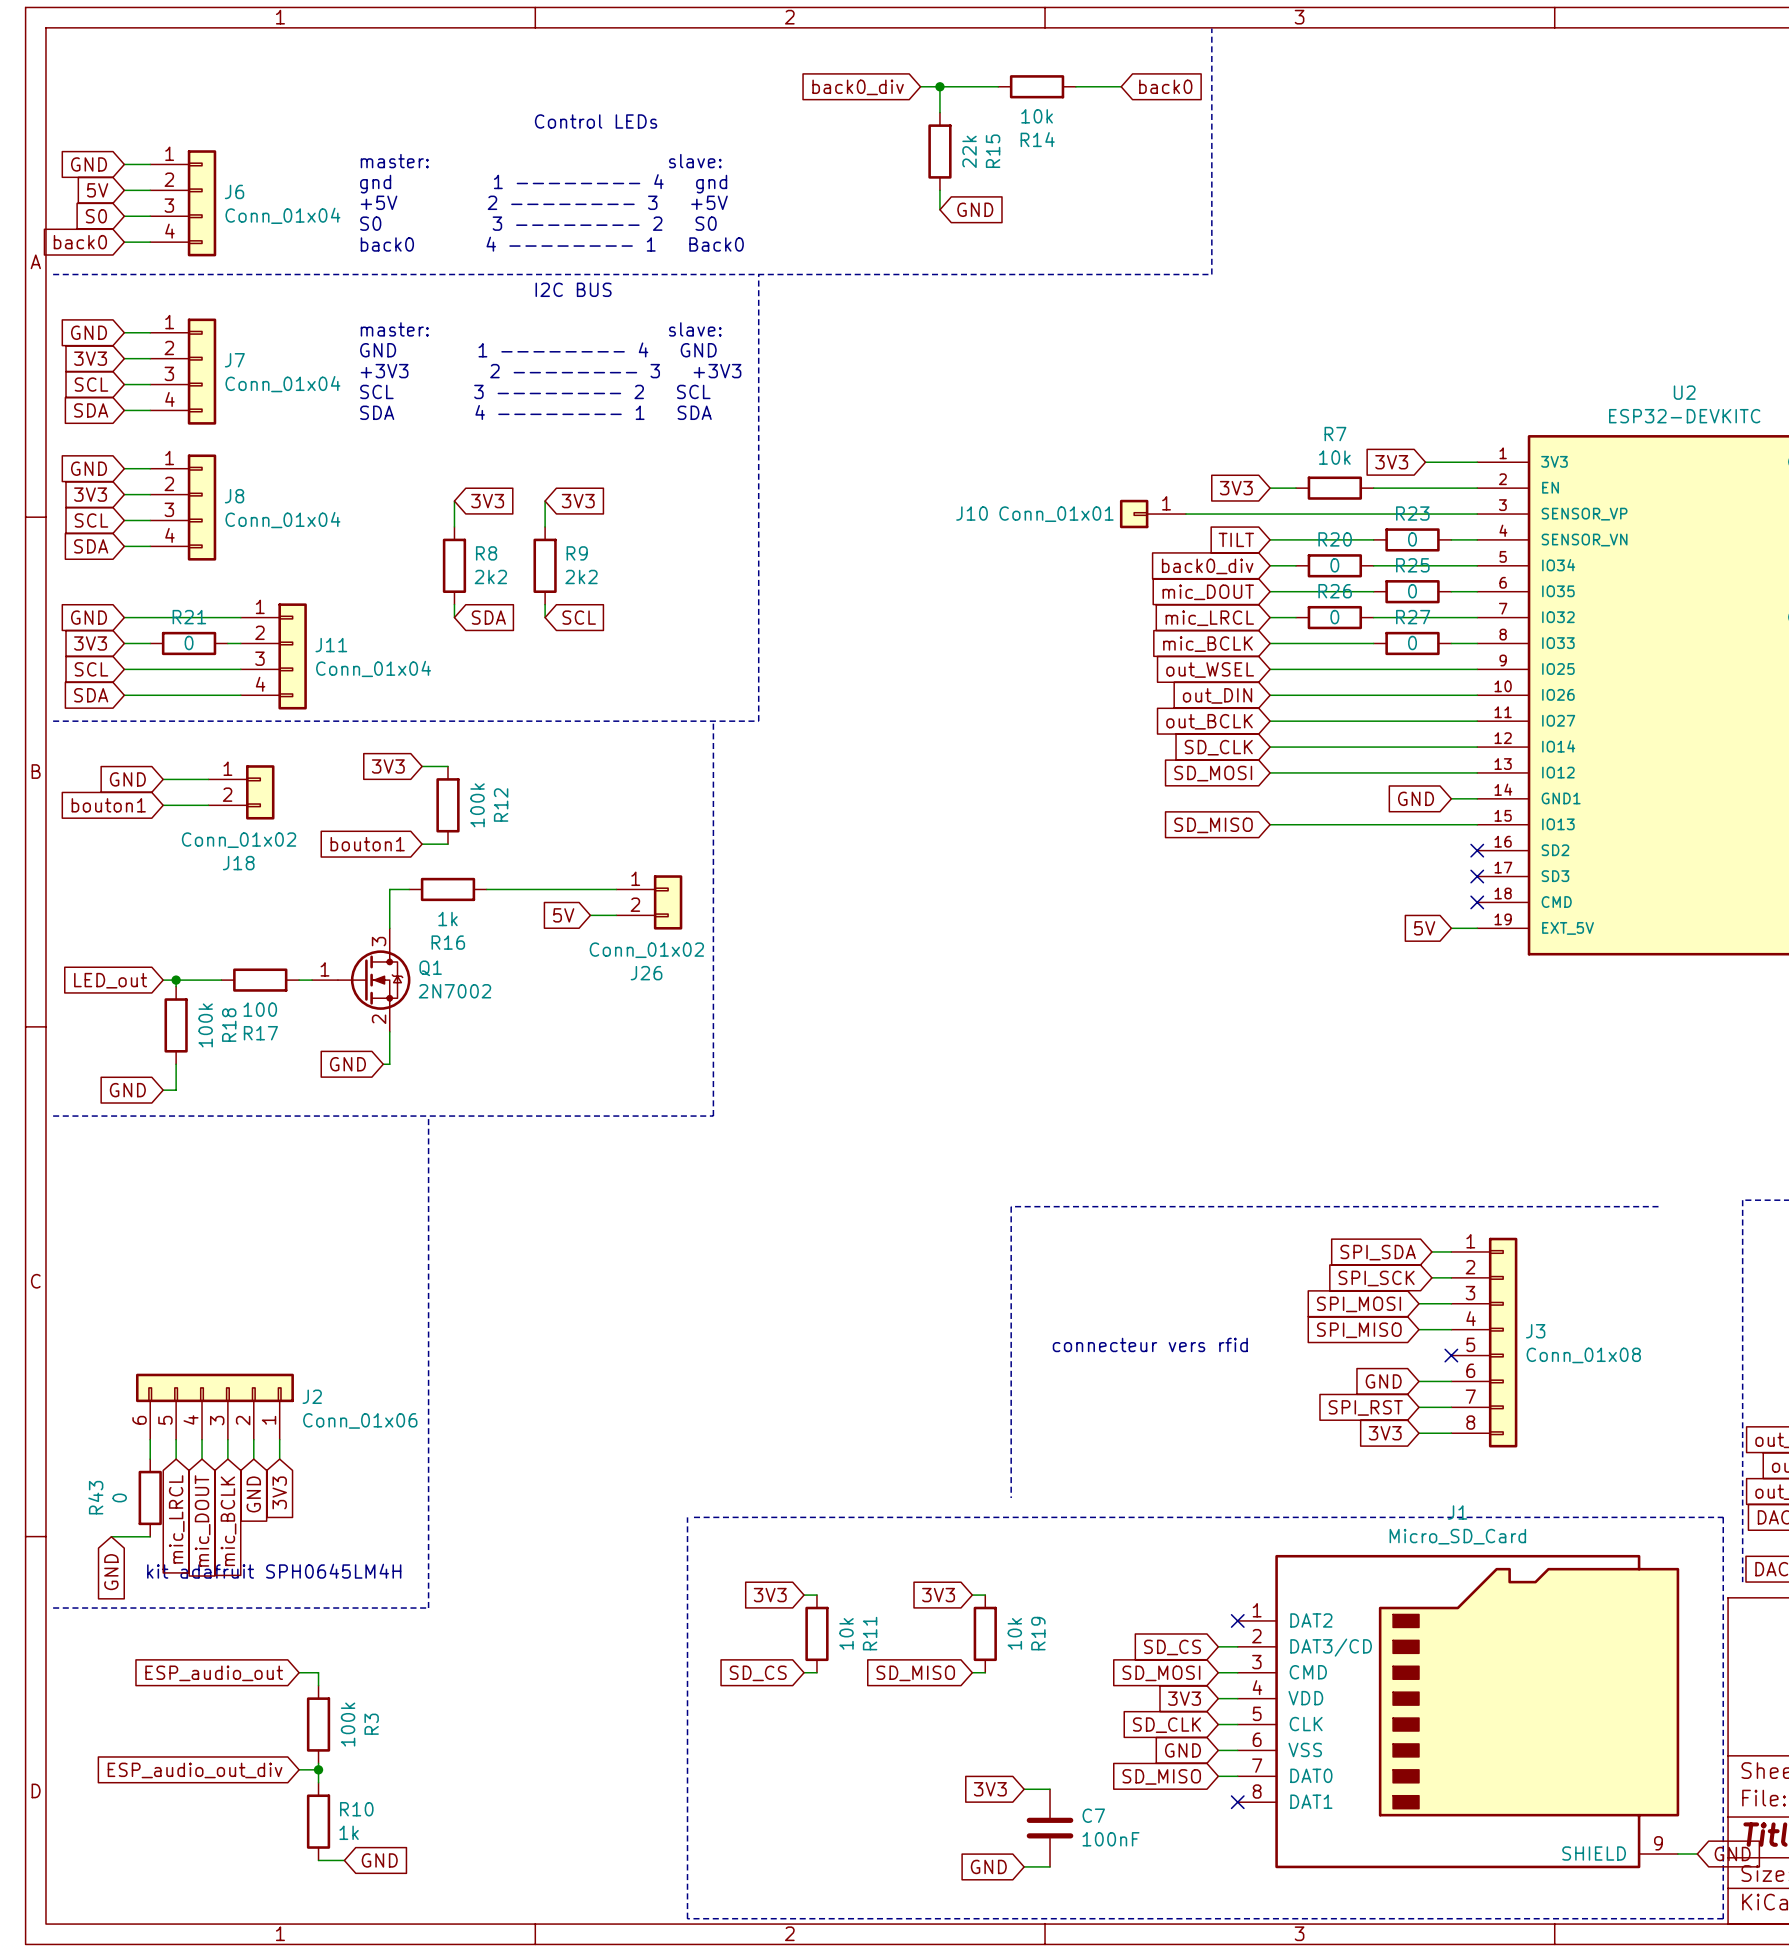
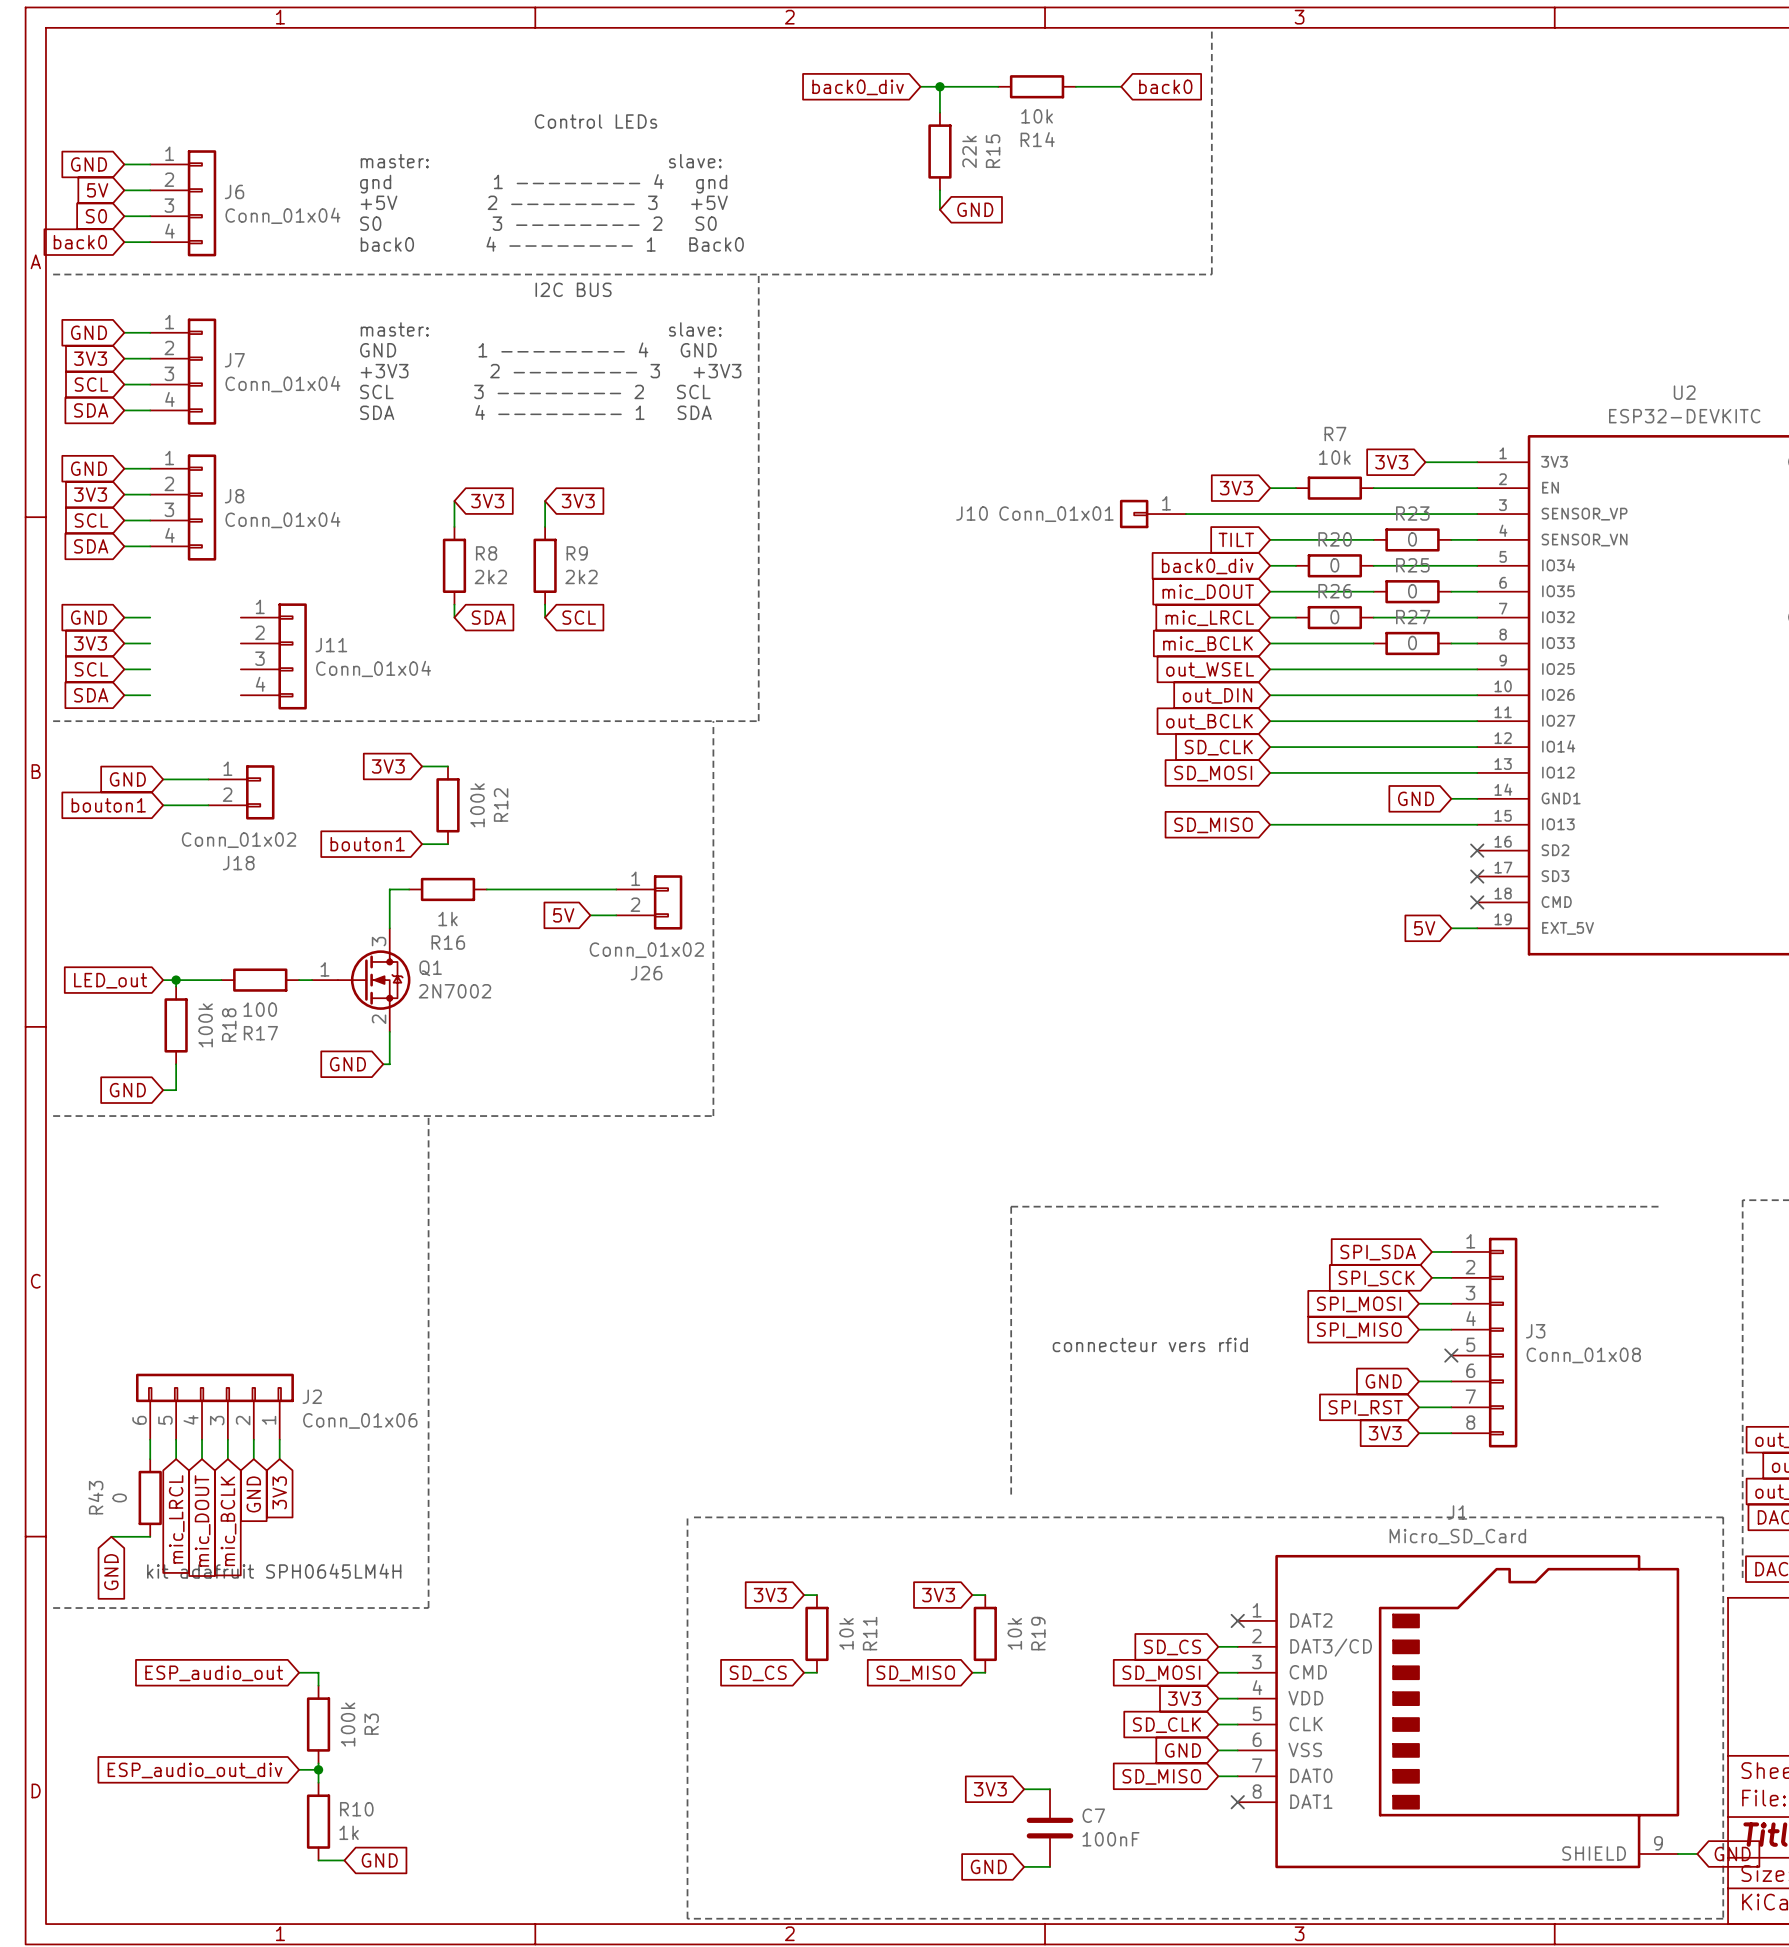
wire: (150, 617) (240, 617) -> none
R21: 0 (189, 643) -> none
wire: (227, 643) (240, 643) -> none
wire: (150, 669) (240, 669) -> none
wire: (150, 695) (240, 695) -> none

